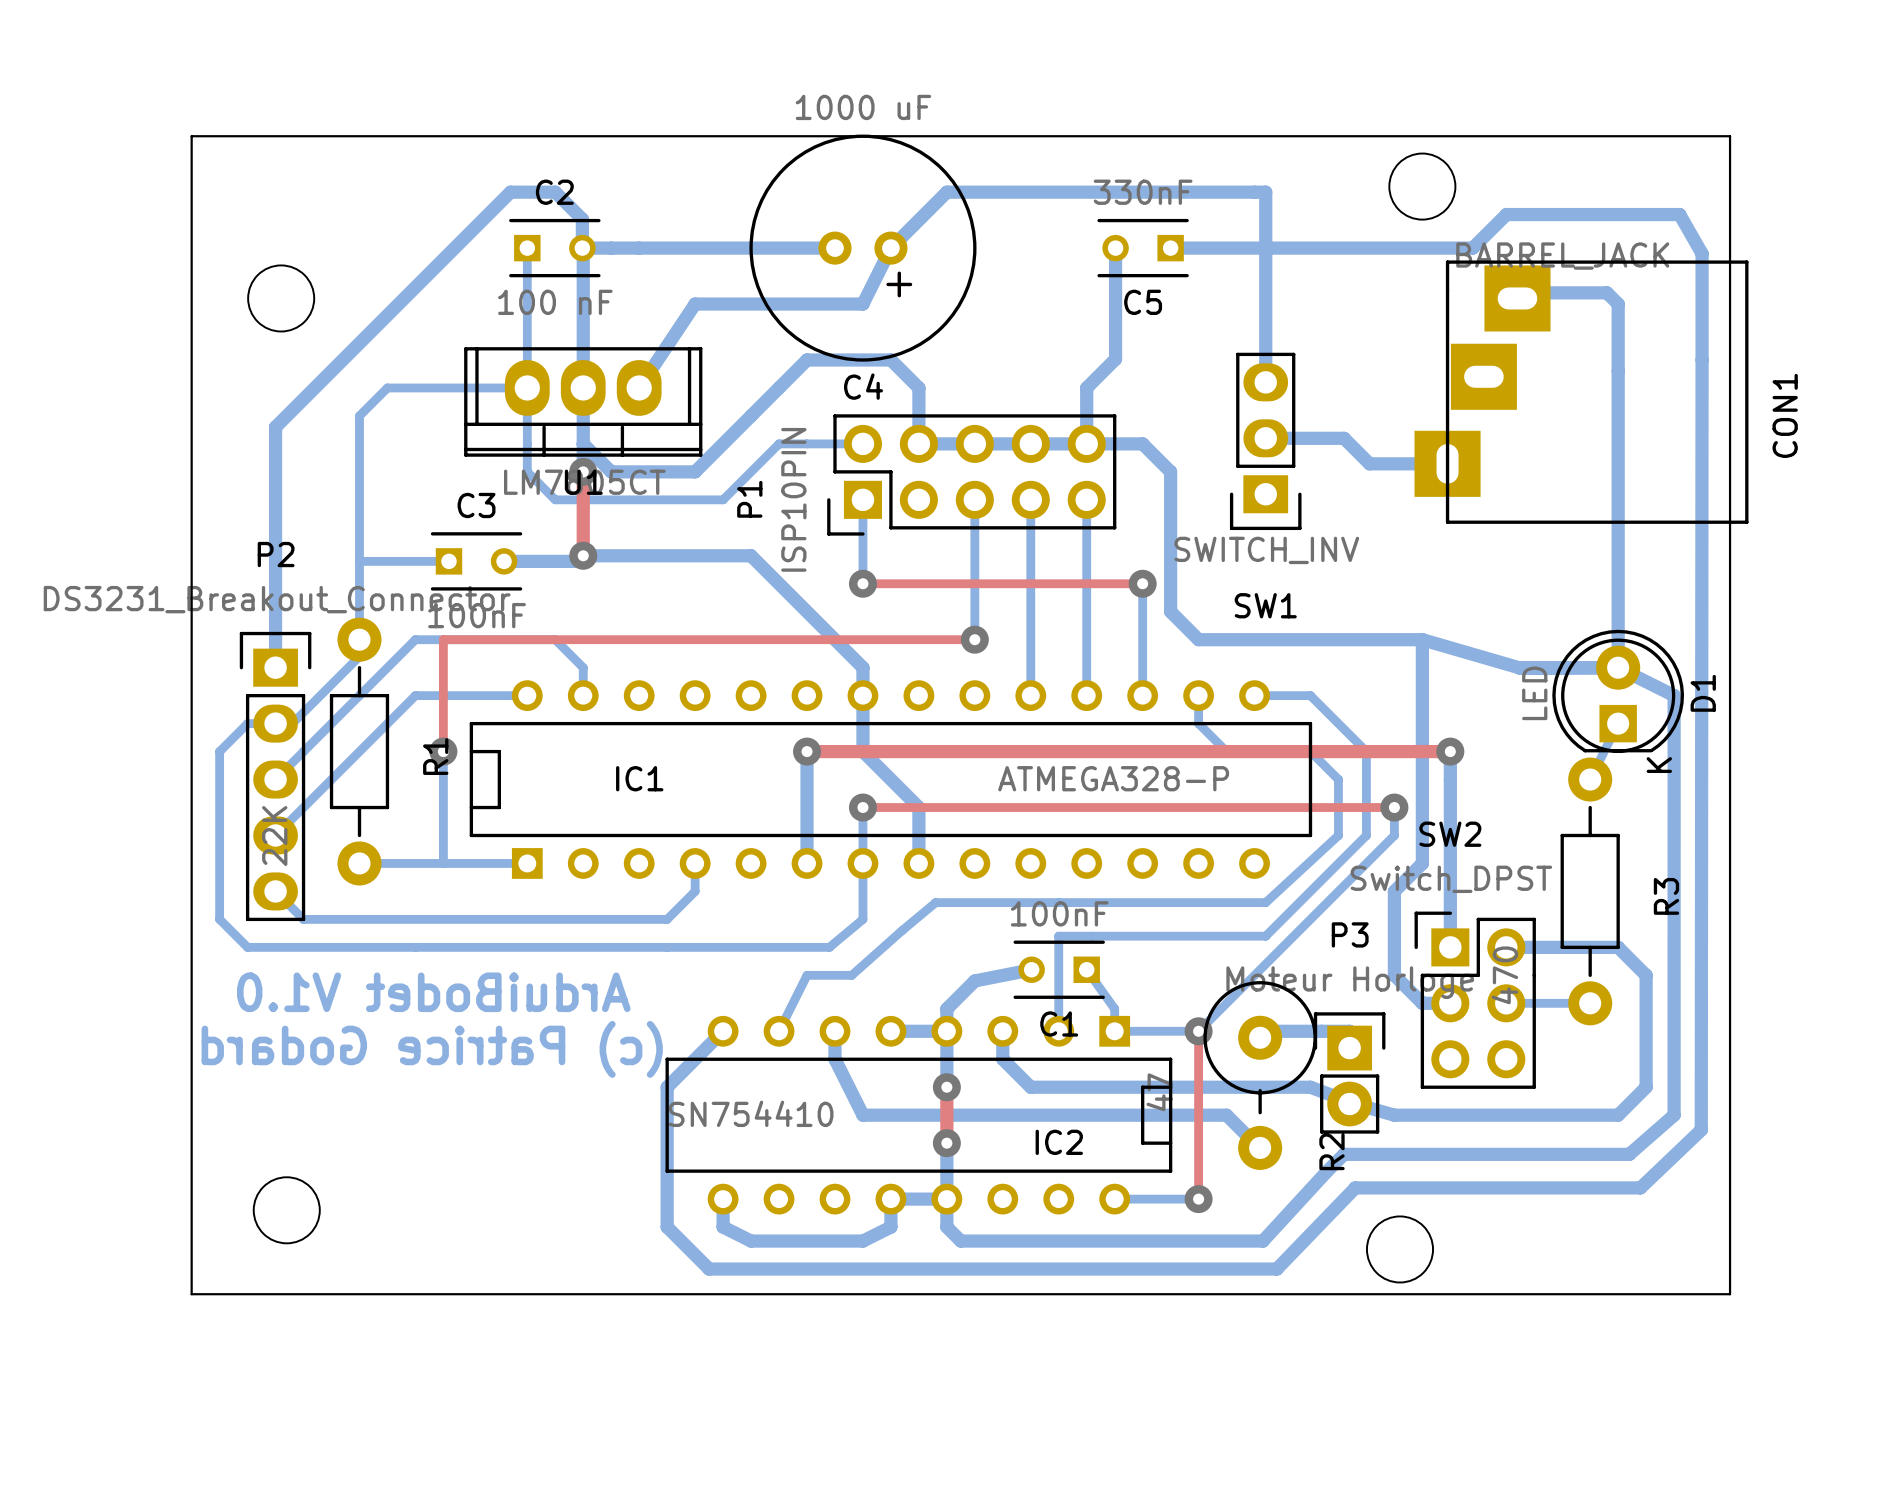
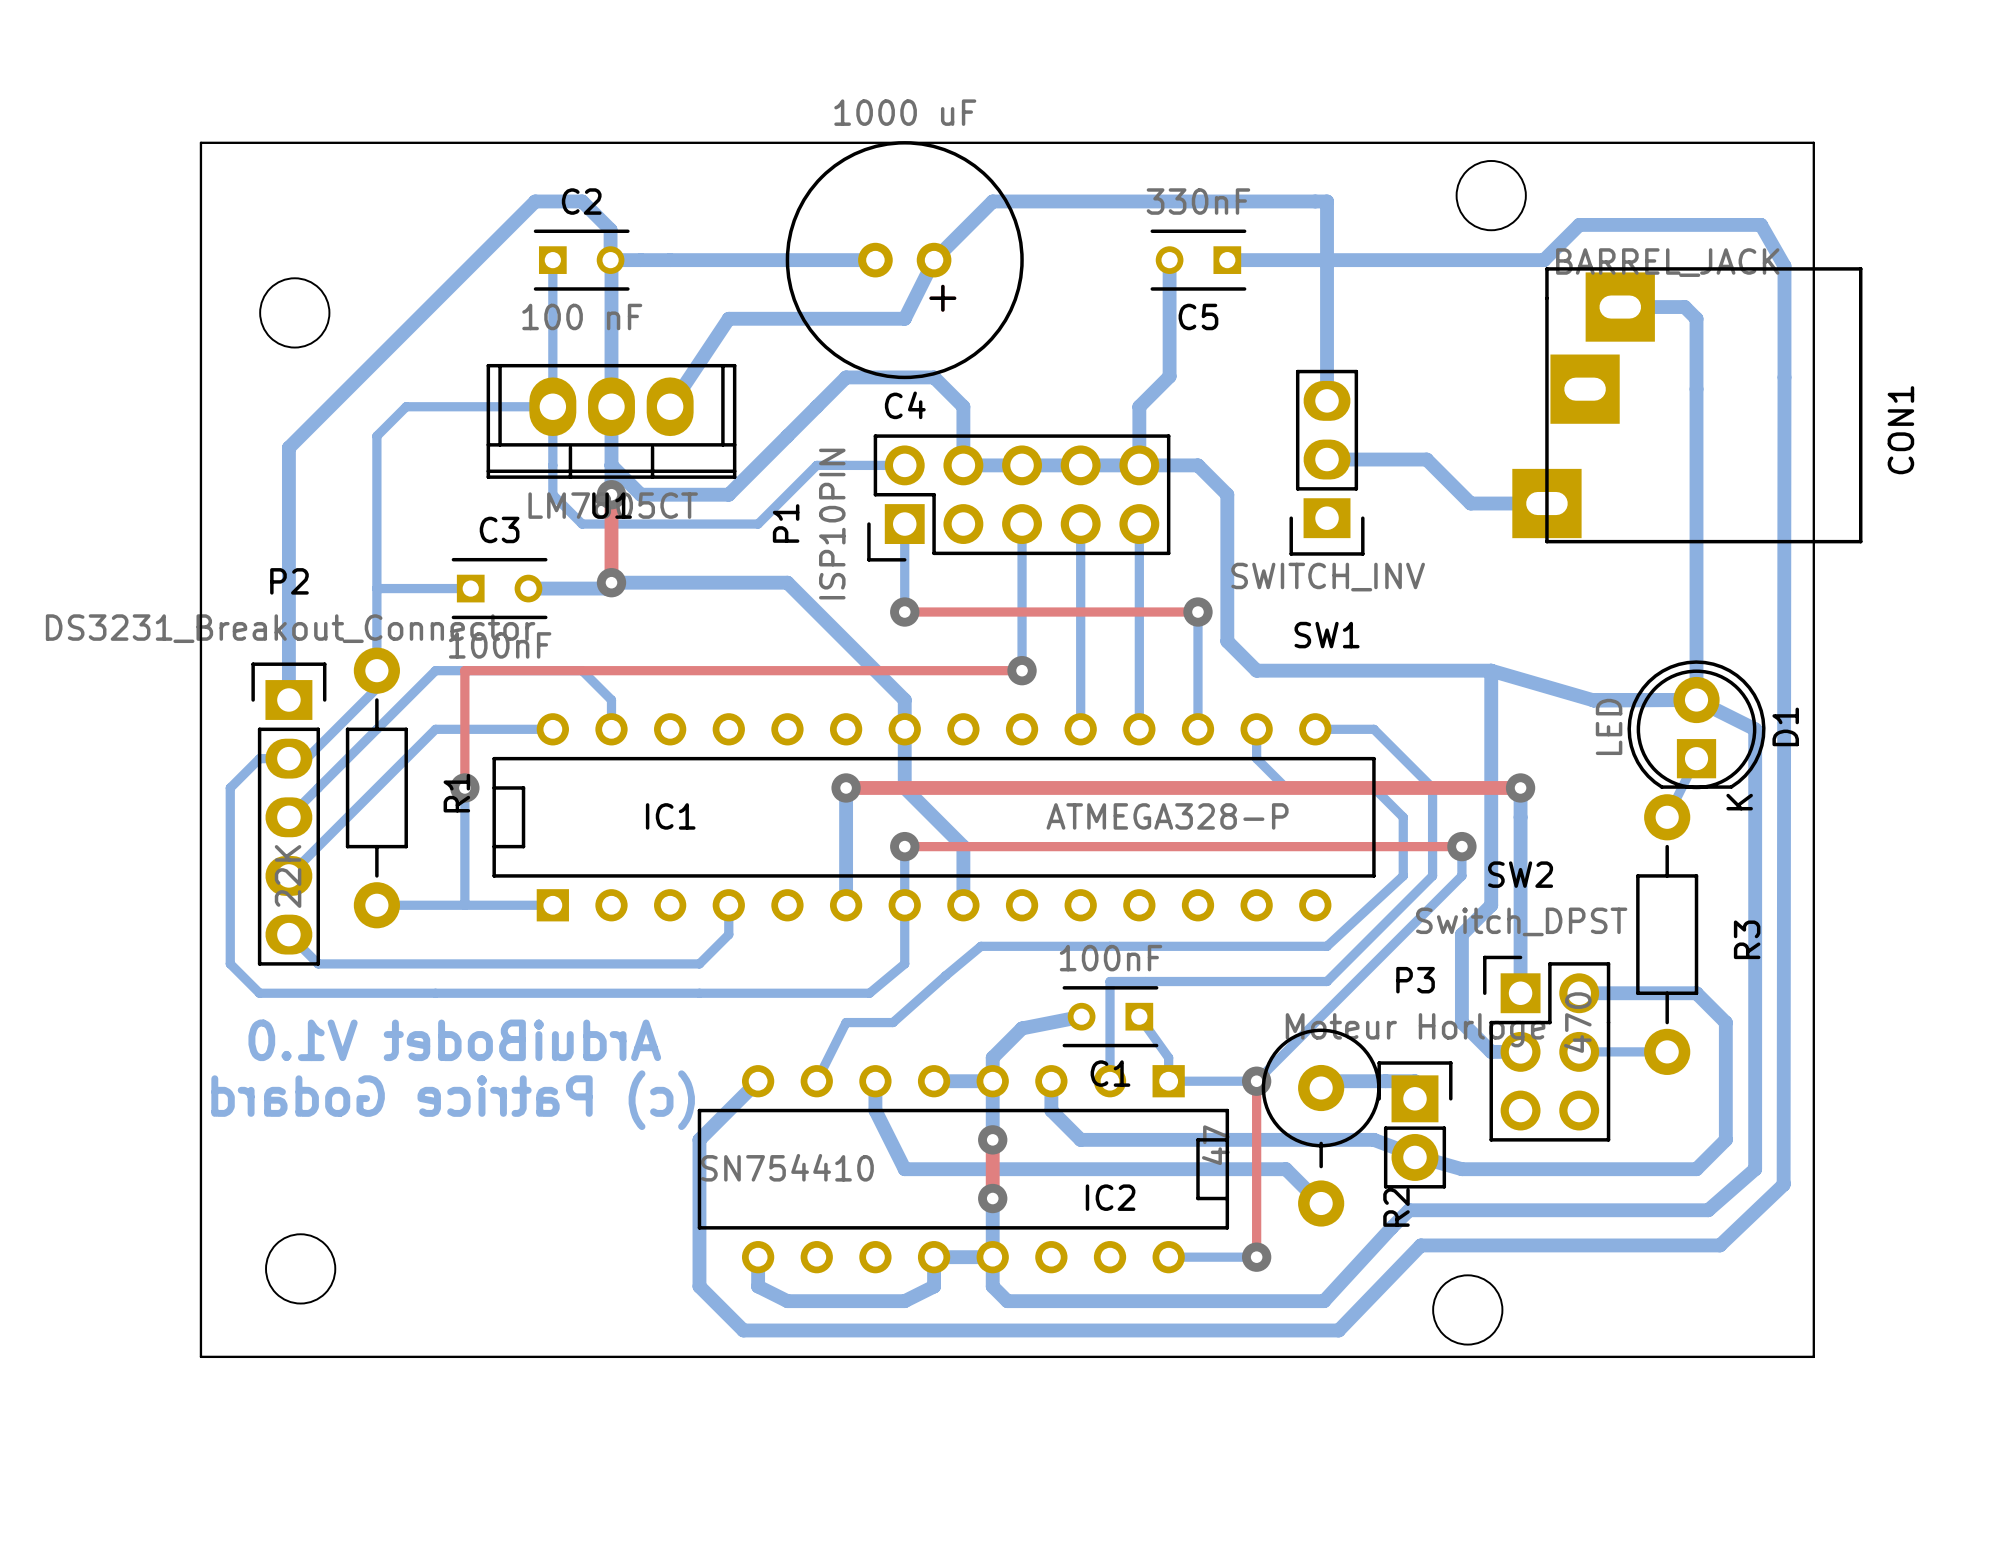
CON1 footprint: [1414, 260, 1749, 524] -> [1512, 267, 1863, 544]
bottom track: (1344, 438) (1369, 463) (1447, 463) -> (1409, 459) (1426, 459) (1470, 503) (1546, 503)

